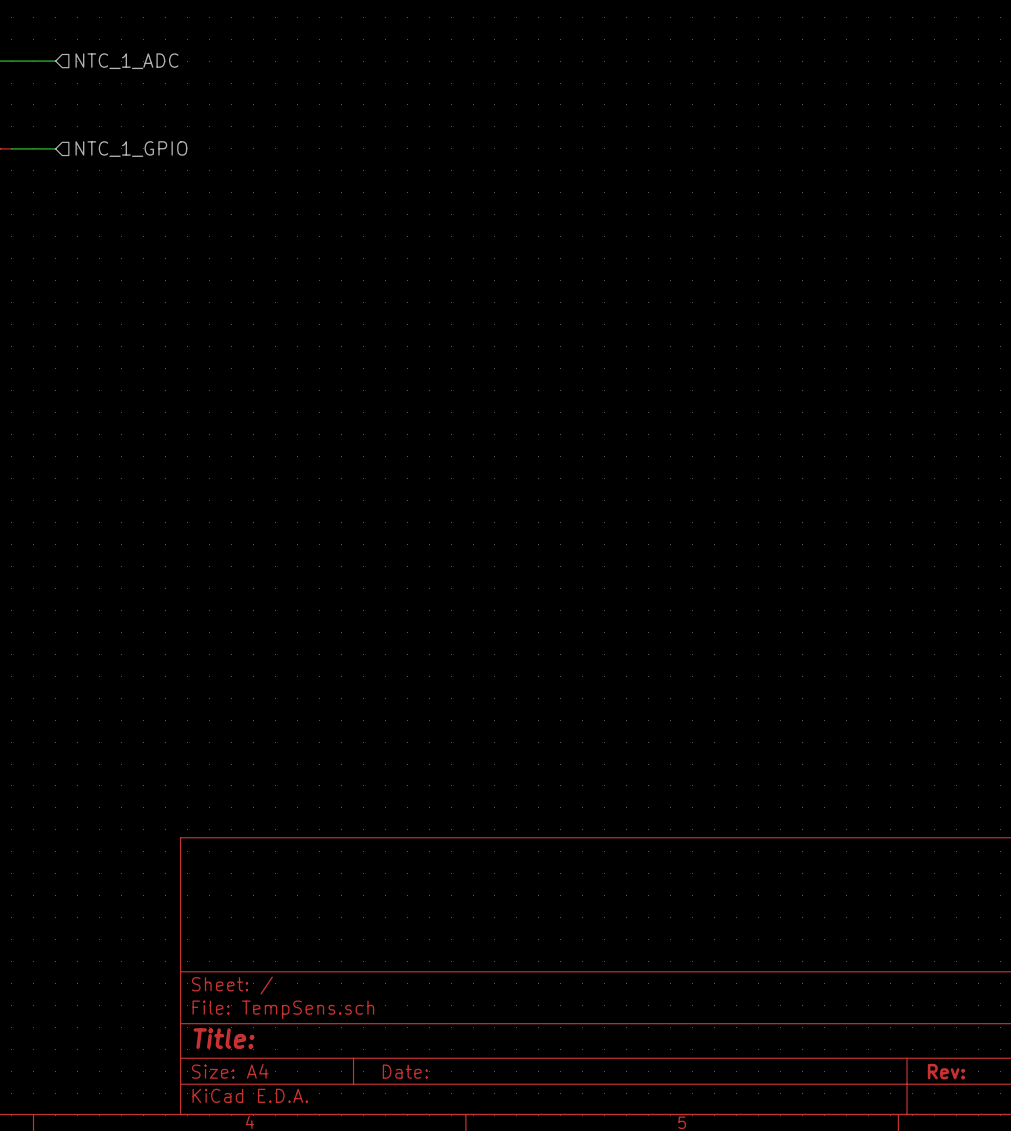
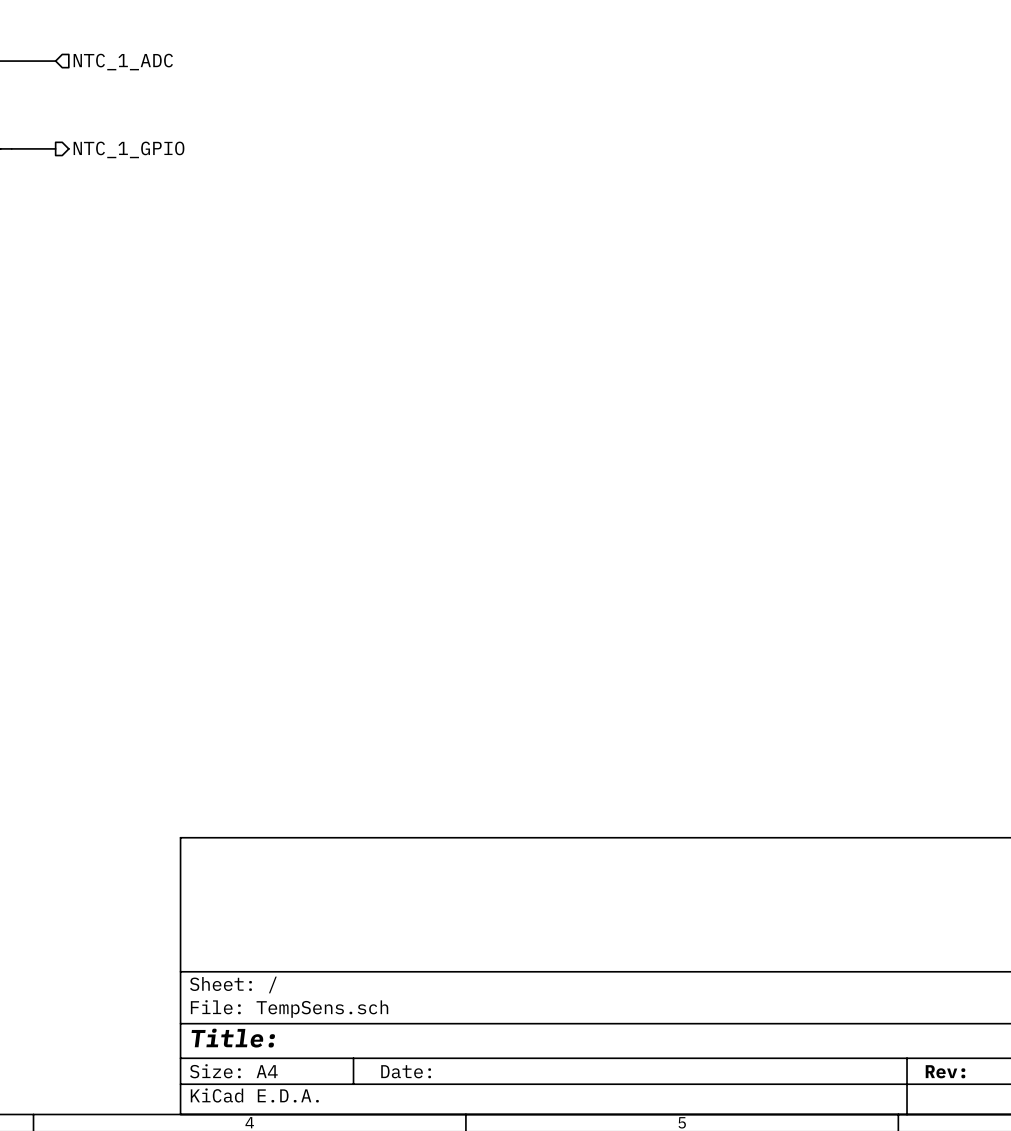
hierarchical label shape: input (131, 149) -> output (129, 149)

